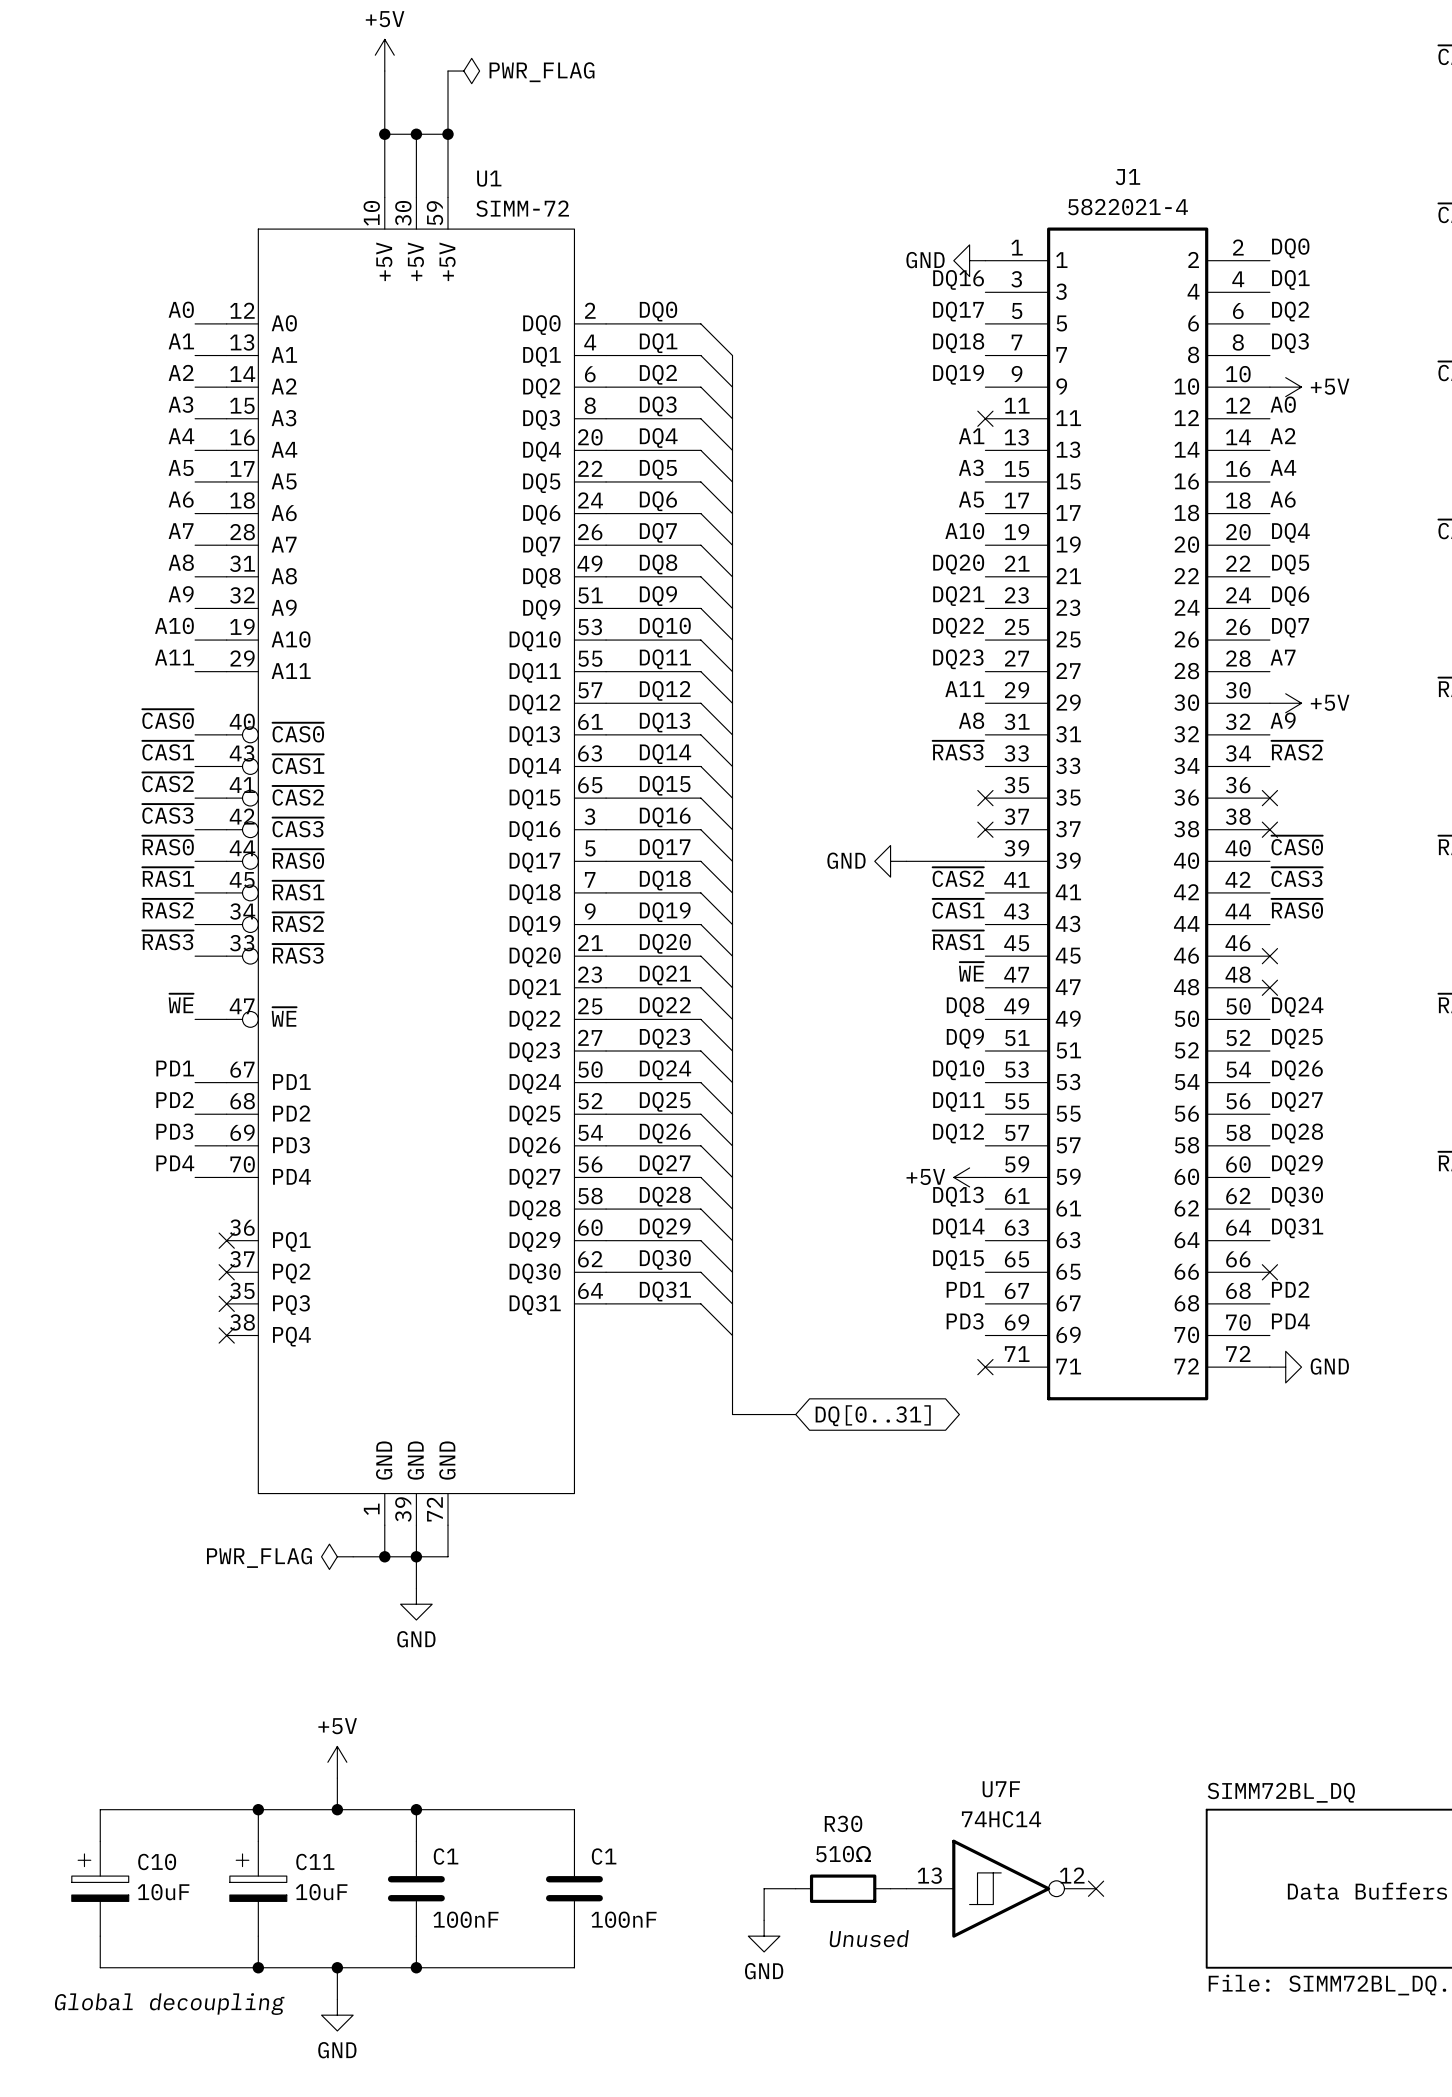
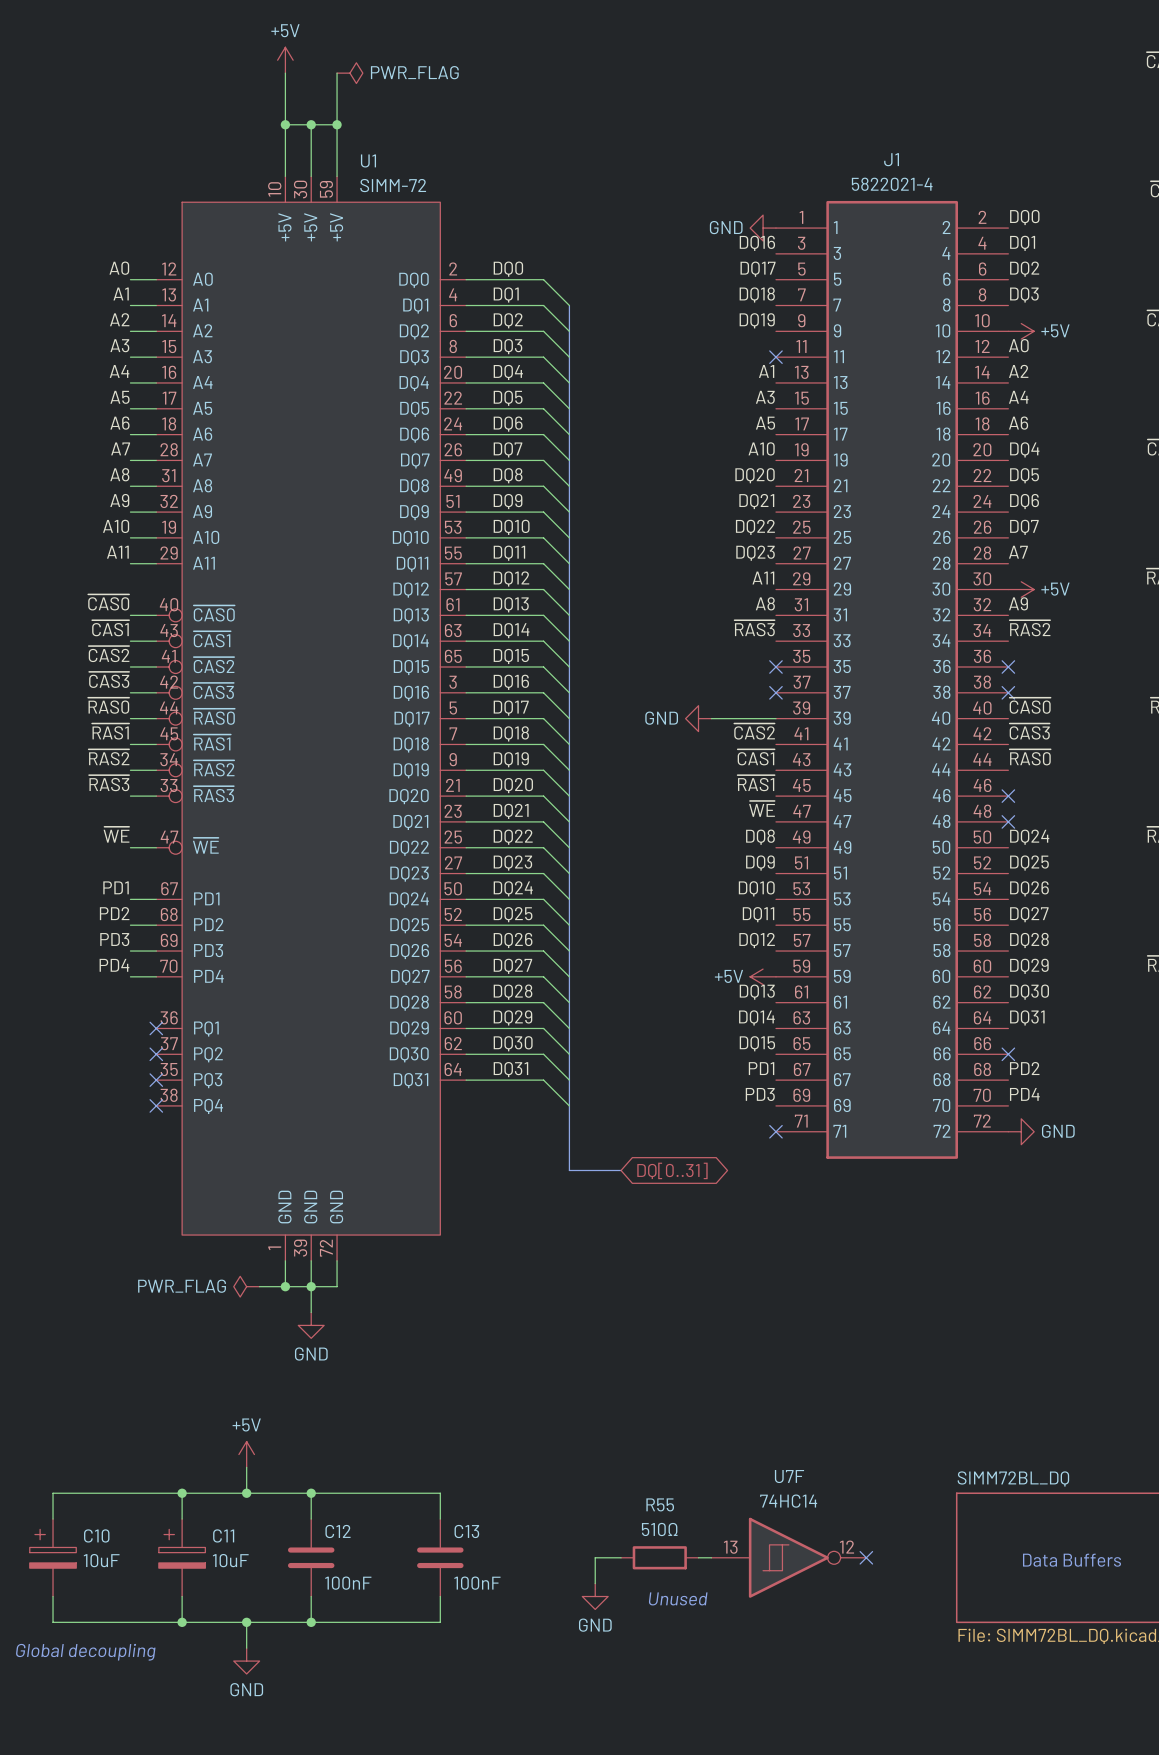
R30 name: R30 (843, 1823) -> R55 (660, 1504)
C1 name: C1 (446, 1856) -> C12 (338, 1531)
C1 name: C1 (604, 1856) -> C13 (466, 1531)

